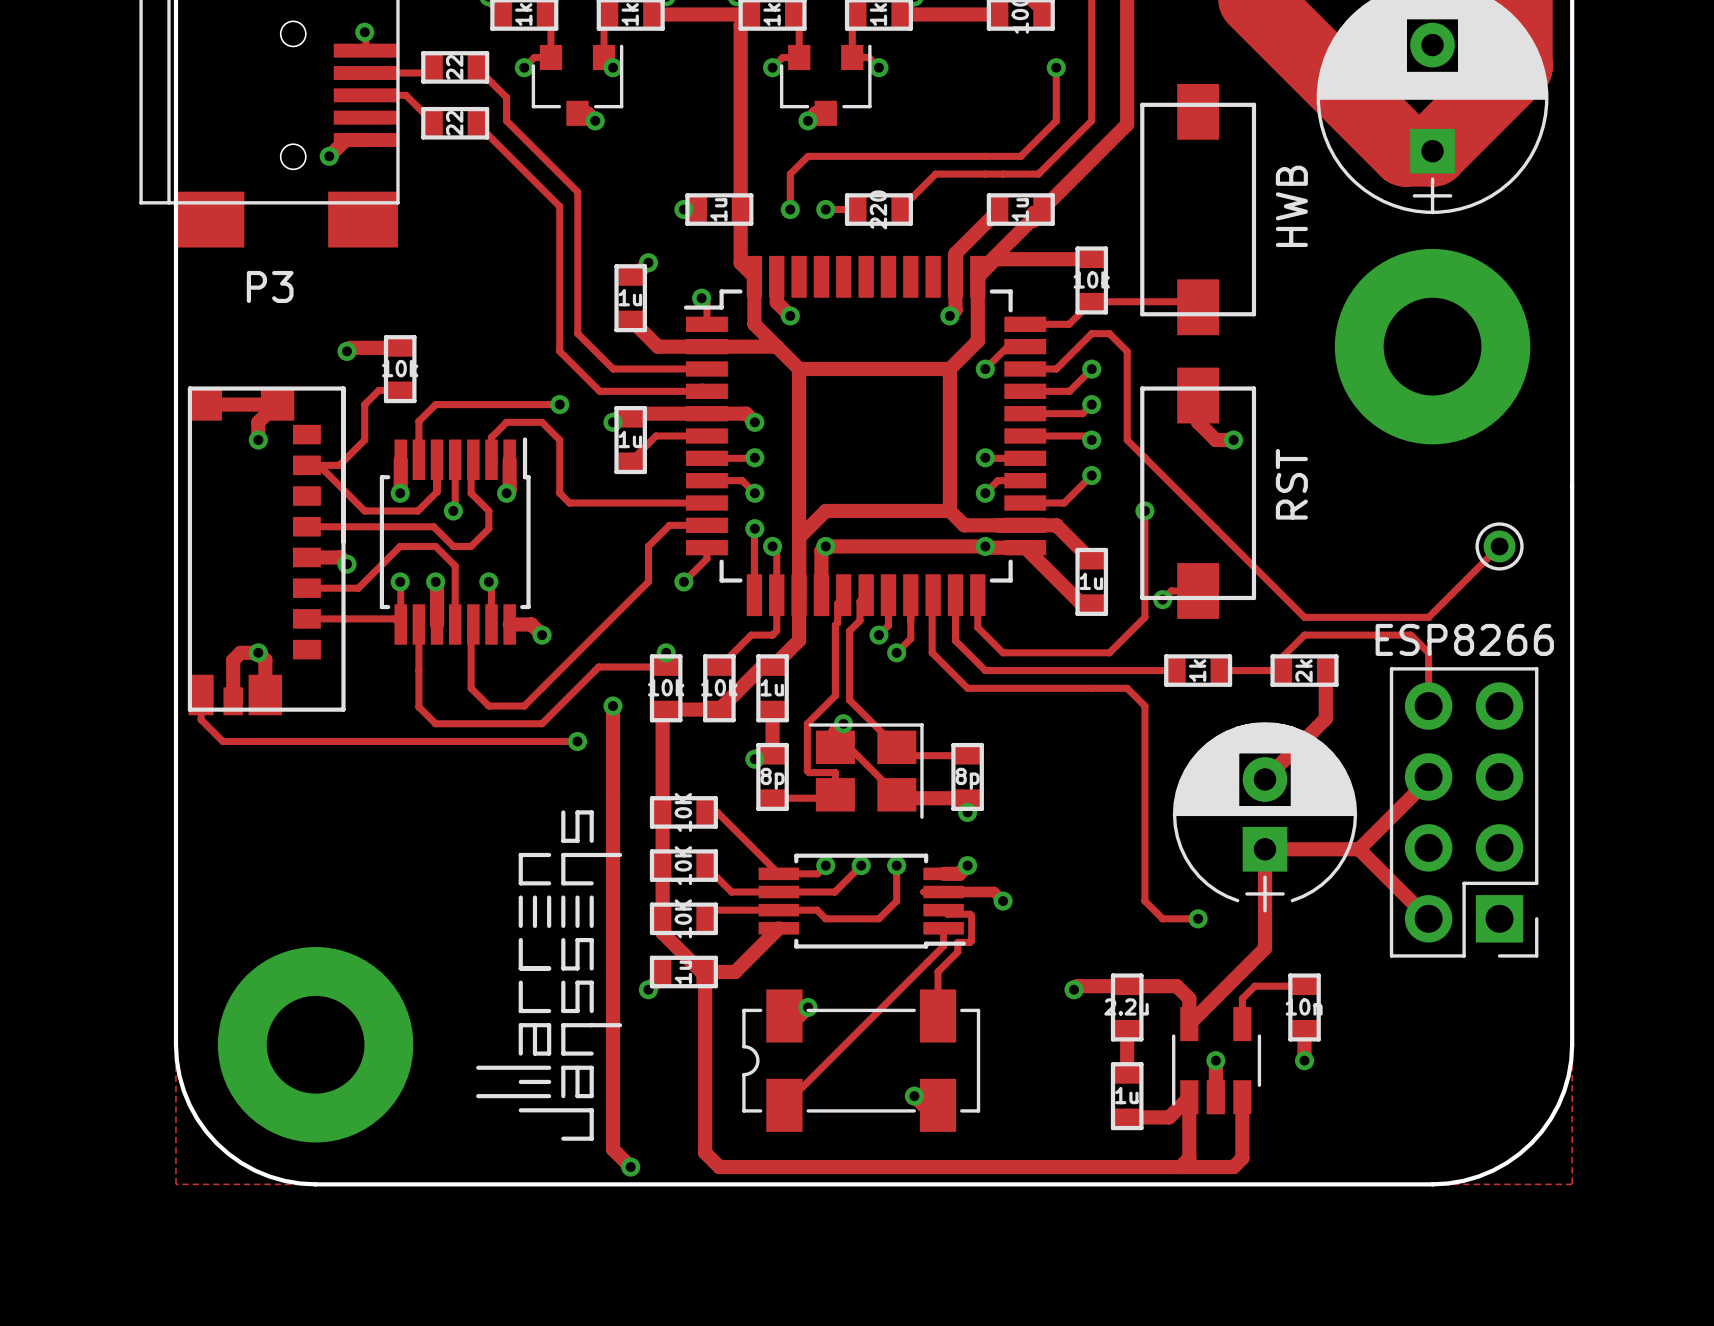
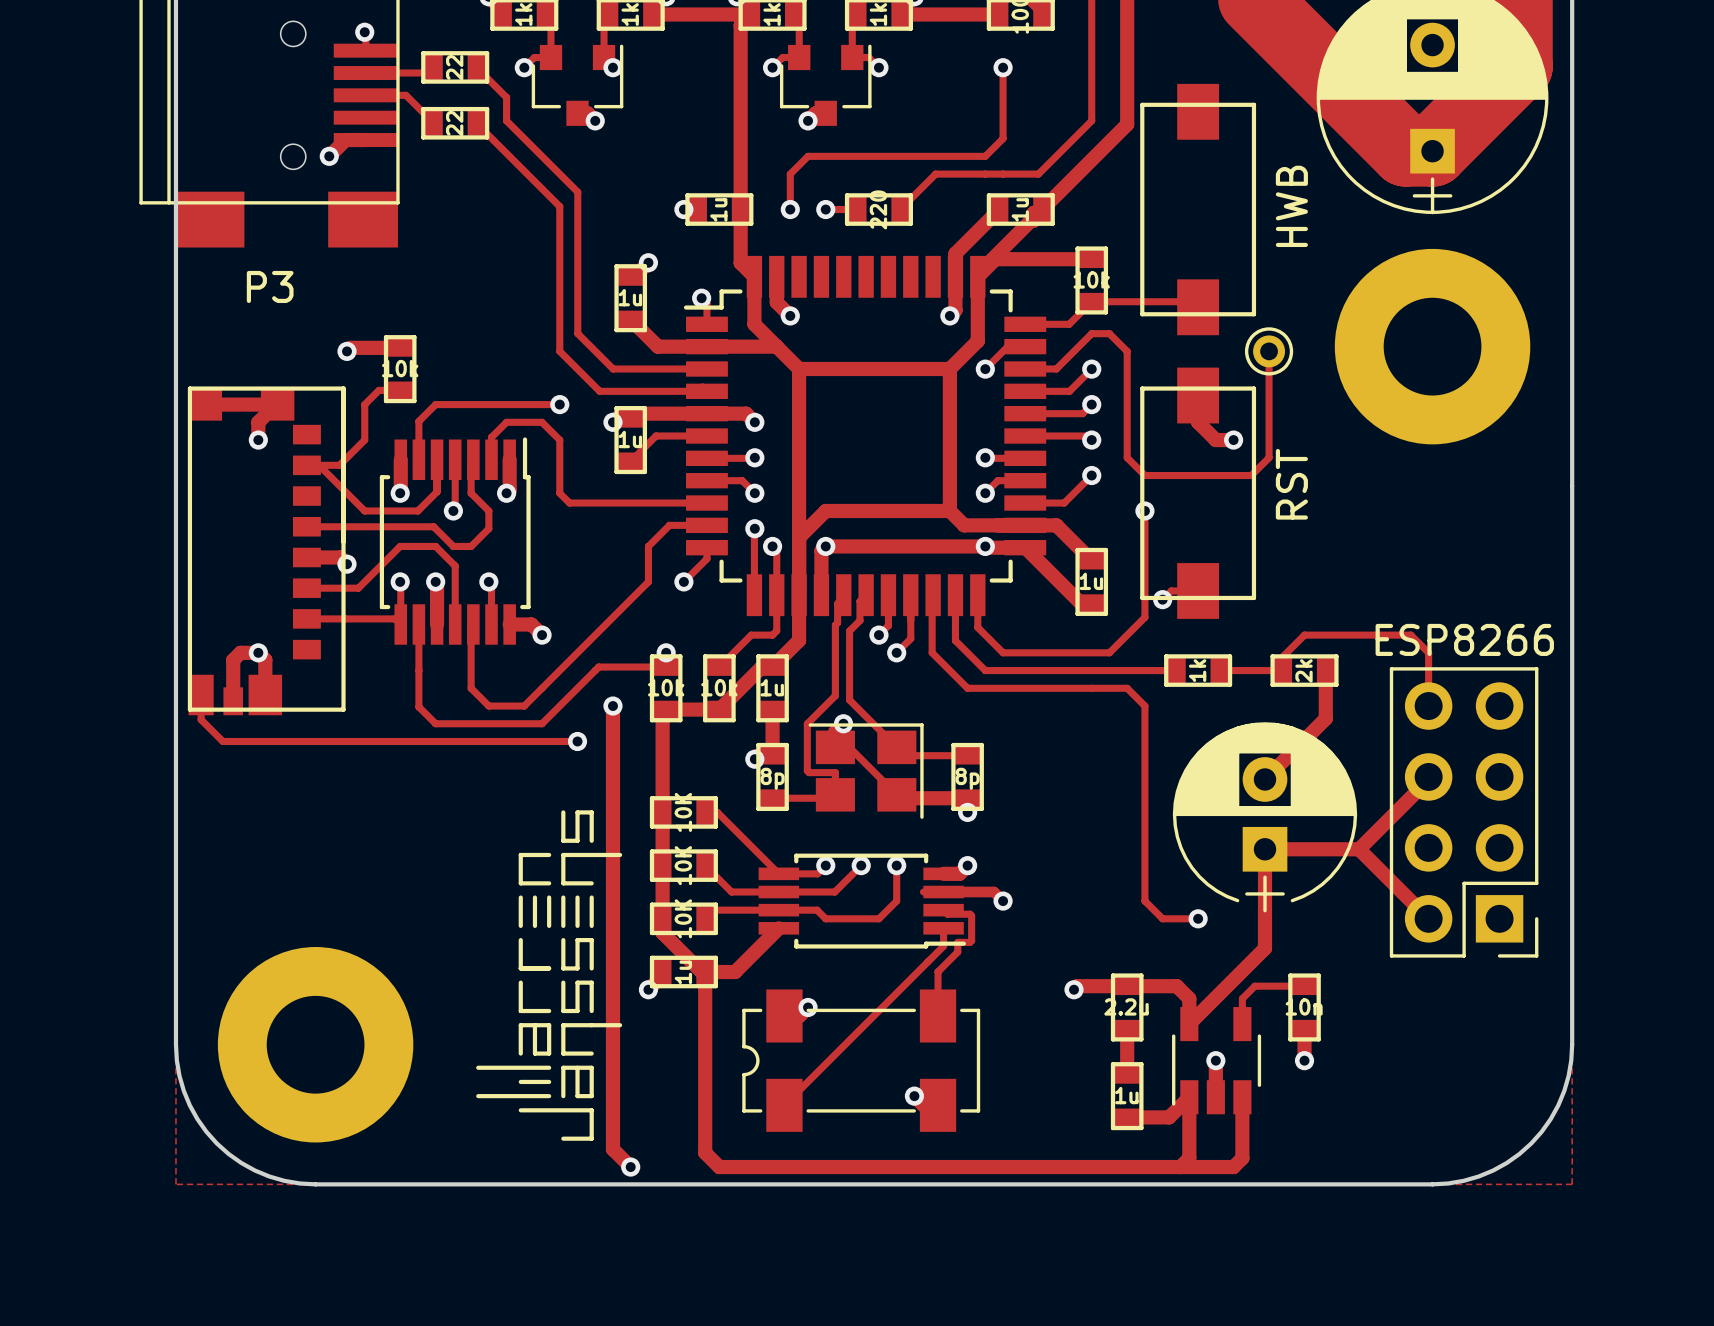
track: (1056, 67) (1056, 120) (1020, 156) (985, 156) -> (1003, 67) (1003, 138) (985, 156)
via position: (1056, 67) -> (1003, 67)
track: (1127, 440) (1304, 617) (1428, 617) (1499, 546) -> (1127, 440) (1127, 457) (1144, 475) (1251, 475) (1269, 457) (1269, 351)
part position: (1499, 546) -> (1269, 351)

